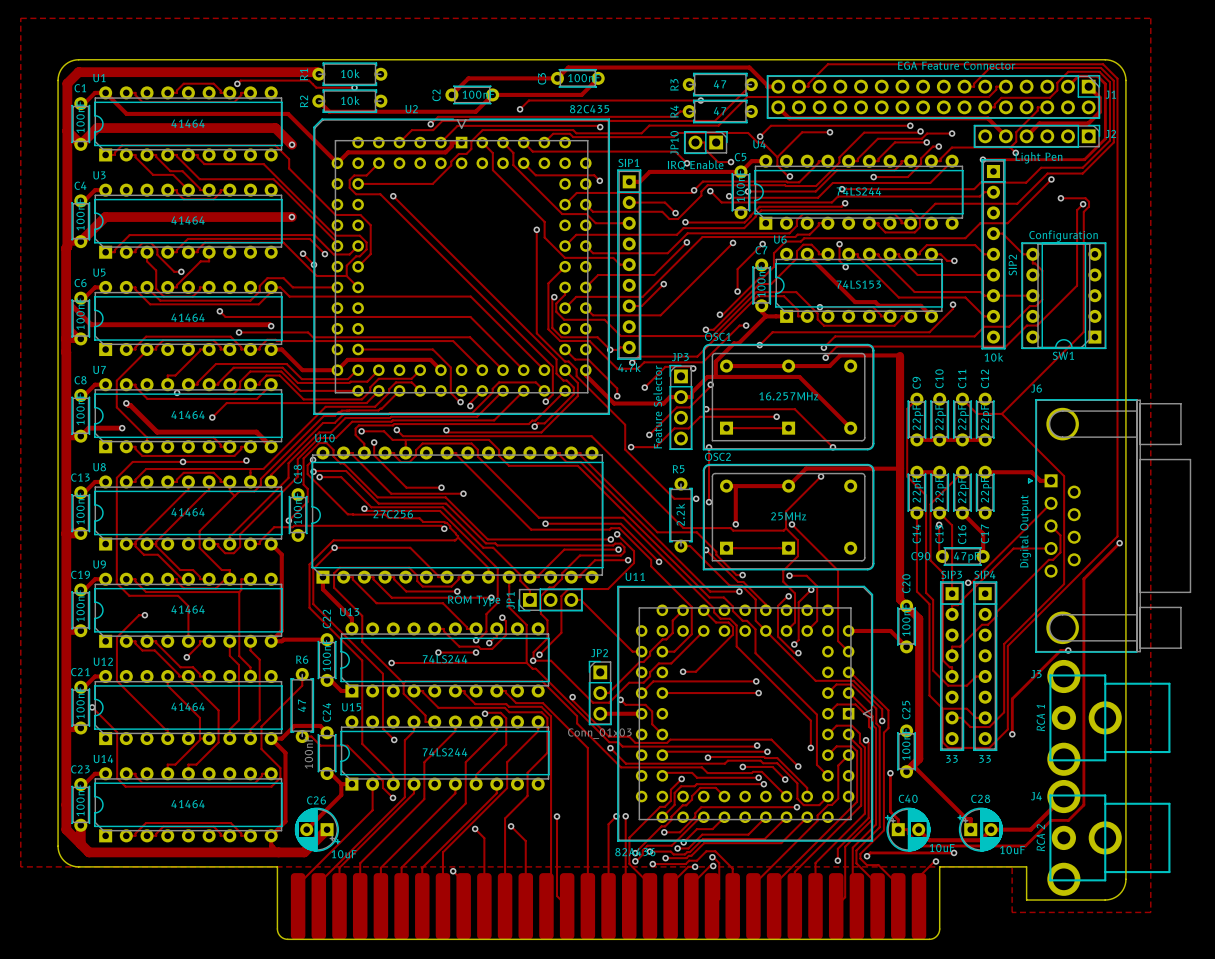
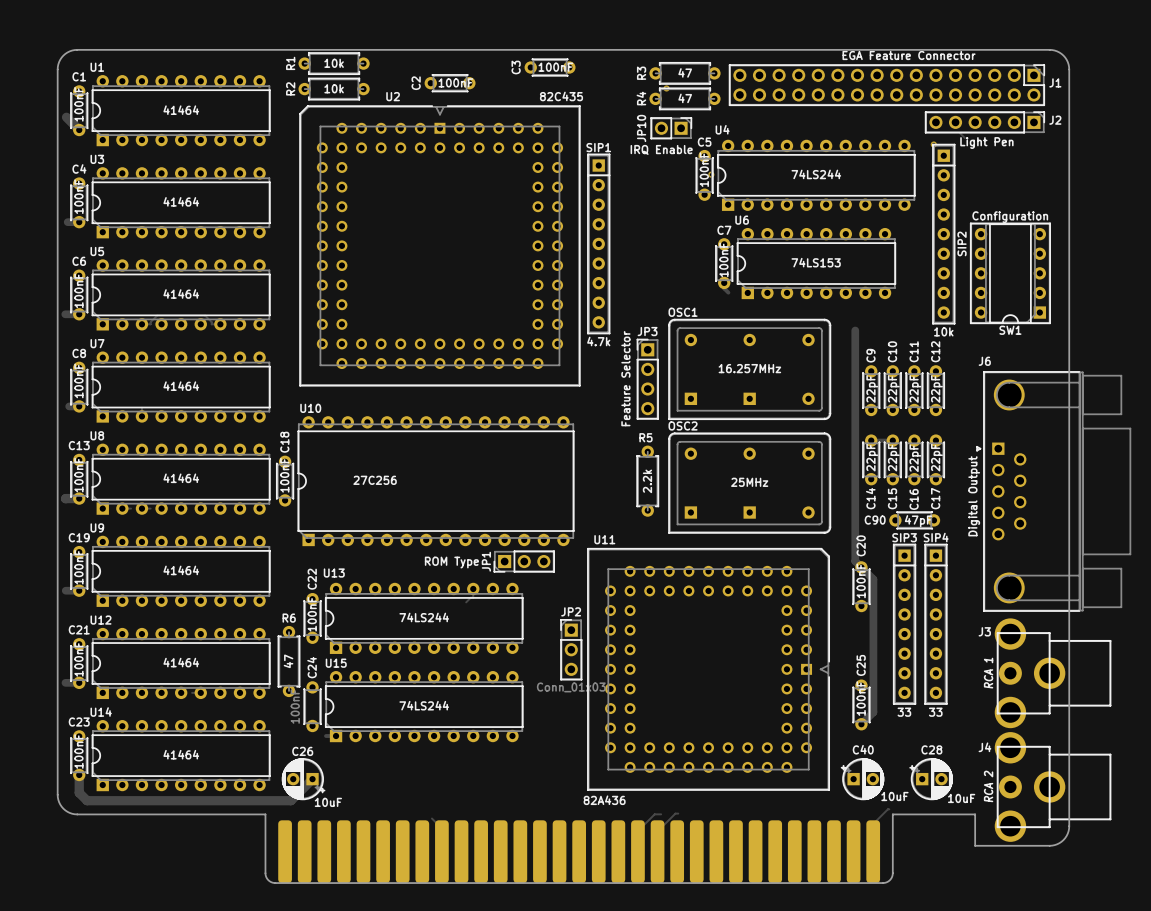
zone outline: (20, 18) (20, 866) (1012, 866) (1012, 912) (1150, 912) (1150, 18) (20, 18) -> none
track: (318, 74) (316, 72) (78, 72) (67, 83) (66, 829) (80, 844) -> none
track: (598, 78) (581, 94) (492, 94) (475, 111) (329, 111) (318, 101) -> none
track: (237, 83) (240, 80) (309, 80) (316, 87) (354, 87) -> none
via: (237, 83) -> none
track: (751, 84) (715, 120) (442, 120) (433, 130) (411, 130) (399, 142) -> none
track: (778, 86) (767, 86) (749, 67) (568, 67) (557, 78) (468, 78) (451, 94) -> none
track: (798, 86) (808, 86) (808, 83) (827, 64) (1103, 64) (1117, 78) (1117, 536) (1007, 646) (1007, 729) (989, 747) (948, 747) (942, 742) (942, 708) -> none
track: (964, 86) (974, 86) (974, 83) (989, 67) (1100, 67) (1113, 80) (1113, 142) (1082, 173) (1047, 173) (1017, 203) (935, 203) (919, 219) -> none
track: (1005, 86) (996, 86) (996, 89) (988, 97) (747, 97) (718, 125) (649, 125) (641, 133) (576, 133) (573, 130) (482, 130) (471, 141) (471, 149) (466, 153) (458, 153) (451, 161) (451, 165) (432, 183) (358, 183) -> none
track: (1068, 86) (1078, 76) (1097, 76) (1105, 84) (1105, 138) (1084, 159) (982, 159) -> none
track: (1088, 86) (1099, 97) (1099, 112) (1088, 123) (1039, 123) (1026, 136) -> none
via: (354, 87) -> none
track: (126, 92) (135, 92) (142, 102) (234, 102) (241, 92) (250, 92) -> none
track: (167, 92) (176, 92) (183, 83) (213, 83) (220, 92) (229, 92) -> none
track: (700, 100) (528, 100) (520, 109) -> none
track: (80, 103) (84, 103) (95, 92) (105, 92) (126, 113) (288, 113) (337, 163) (348, 152) (445, 152) (451, 146) (451, 142) (461, 142) -> none
track: (778, 107) (789, 118) (987, 118) (1005, 136) -> none
track: (985, 107) (994, 107) (994, 104) (1001, 97) (1049, 97) (1057, 90) (1057, 82) (1068, 71) (1099, 71) (1110, 82) (1110, 140) (1082, 167) (1041, 167) (1026, 182) (980, 182) (974, 189) (842, 189) -> none
track: (1047, 107) (1037, 107) (1037, 110) (1016, 132) (1016, 141) (1010, 147) (951, 147) (940, 161) (931, 161) -> none
via: (520, 109) -> none
track: (689, 111) (680, 111) (674, 116) (438, 116) (430, 124) -> none
via: (430, 124) -> none
track: (910, 125) (770, 125) (760, 136) -> none
via: (910, 125) -> none
track: (600, 127) (457, 125) (440, 142) -> none
via: (600, 127) -> none
track: (920, 131) (864, 132) (839, 157) (839, 162) (816, 186) (707, 185) (701, 191) (701, 195) (678, 219) (669, 219) (662, 211) (592, 211) (585, 204) -> none
via: (920, 131) -> none
track: (829, 132) (802, 132) (777, 157) -> none
via: (829, 132) -> none
track: (952, 133) (927, 133) (921, 138) (877, 138) (857, 158) (857, 161) (848, 161) -> none
via: (952, 133) -> none
via: (760, 136) -> none
track: (482, 142) (492, 153) (492, 170) (544, 221) (544, 237) (564, 257) (613, 257) (620, 264) (629, 264) -> none
track: (503, 142) (513, 152) (513, 165) (562, 214) (586, 214) (595, 223) (629, 223) -> none
track: (523, 142) (532, 151) (675, 151) (687, 163) -> none
track: (544, 142) (553, 133) (569, 133) (573, 137) (673, 137) (677, 132) (748, 132) (757, 142) (762, 142) (777, 157) -> none
track: (695, 142) (705, 142) (705, 149) (718, 162) (731, 162) -> none
track: (926, 142) (894, 142) (878, 158) (878, 161) (869, 161) -> none
via: (926, 142) -> none
track: (80, 144) (97, 128) (275, 128) (292, 144) -> none
via: (292, 144) -> none
track: (938, 146) (932, 146) (921, 158) (921, 163) (907, 177) (873, 177) -> none
via: (938, 146) -> none
via: (1015, 152) -> none
track: (105, 154) (114, 154) (122, 145) (275, 145) (289, 159) (289, 168) (335, 214) (360, 214) (370, 225) (370, 254) (358, 266) -> none
track: (126, 154) (135, 154) (135, 157) (153, 174) (173, 174) (188, 190) -> none
track: (147, 154) (156, 154) (170, 171) (182, 171) (199, 190) (209, 190) -> none
track: (167, 154) (176, 154) (199, 179) (273, 179) (337, 243) (337, 246) -> none
track: (188, 154) (197, 154) (204, 164) (263, 164) (335, 235) (359, 235) (366, 242) (366, 249) (346, 265) (346, 276) -> none
track: (777, 157) (777, 165) (789, 176) -> none
track: (765, 161) (751, 161) (741, 171) (649, 171) (639, 181) (629, 181) -> none
track: (827, 161) (818, 161) (799, 182) (702, 181) (691, 192) (576, 192) (565, 204) -> none
track: (910, 161) (901, 161) (894, 170) (836, 170) (815, 191) (748, 191) -> none
track: (952, 161) (930, 182) (832, 182) (818, 197) (730, 197) (729, 196) -> none
via: (731, 162) -> none
track: (378, 163) (366, 175) (354, 175) (349, 179) (349, 187) (356, 194) (380, 194) (552, 366) (552, 394) (545, 401) -> none
track: (523, 163) (535, 175) (594, 175) (599, 180) -> none
via: (687, 163) -> none
via: (789, 176) -> none
via: (873, 177) -> none
track: (1051, 179) (1007, 223) (980, 223) (965, 238) (804, 238) (800, 241) (785, 241) (773, 253) (773, 266) (762, 278) (759, 278) (722, 314) (719, 314) -> none
via: (1051, 179) -> none
via: (599, 180) -> none
via: (842, 189) -> none
track: (105, 190) (95, 190) (84, 200) (80, 200) -> none
track: (167, 190) (176, 190) (183, 199) (213, 199) (220, 190) (229, 190) -> none
via: (694, 190) -> none
track: (710, 191) (721, 202) (831, 202) (837, 196) (980, 196) (984, 192) (993, 192) -> none
via: (710, 191) -> none
track: (393, 196) (556, 359) (556, 373) (573, 387) (573, 394) (544, 423) (537, 423) (534, 426) -> none
via: (393, 196) -> none
via: (729, 196) -> none
track: (1060, 198) (1085, 198) (1089, 201) (1089, 206) (1083, 211) (1083, 332) (1001, 413) -> none
via: (1060, 198) -> none
track: (629, 202) (665, 202) (675, 213) -> none
track: (845, 203) (841, 206) (759, 206) (744, 222) (685, 222) -> none
via: (845, 203) -> none
track: (1083, 204) (1077, 210) (1077, 285) (1037, 325) (1026, 325) (1005, 346) (836, 346) (825, 357) -> none
via: (1083, 204) -> none
via: (675, 213) -> none
track: (291, 217) (105, 217) (80, 241) -> none
via: (291, 217) -> none
track: (919, 219) (911, 210) (761, 210) (744, 228) (683, 228) (676, 234) (576, 234) (565, 246) -> none
track: (919, 219) (919, 227) (914, 232) (885, 232) (878, 223) (869, 223) -> none
via: (685, 222) -> none
track: (827, 223) (818, 223) (809, 234) (797, 234) (795, 237) (702, 237) (642, 296) (576, 296) (565, 308) -> none
track: (910, 223) (901, 223) (894, 214) (802, 214) (796, 220) (796, 225) (789, 233) (687, 233) (667, 253) (593, 253) (585, 246) -> none
track: (536, 229) (536, 333) (564, 361) (568, 361) (576, 369) (576, 376) (625, 424) (625, 449) (674, 498) (696, 498) -> none
via: (536, 229) -> none
track: (993, 233) (1002, 233) (1023, 254) (1032, 254) (1032, 263) (1042, 270) (1042, 299) (1036, 306) (1029, 306) (1009, 326) (984, 326) (974, 336) (835, 336) (823, 347) -> none
track: (686, 242) (654, 274) (598, 274) (585, 287) -> none
via: (686, 242) -> none
track: (733, 242) (660, 315) (593, 315) (585, 308) -> none
via: (733, 242) -> none
track: (762, 244) (737, 269) (737, 291) -> none
via: (762, 244) -> none
track: (839, 244) (839, 260) (845, 267) -> none
via: (839, 244) -> none
track: (358, 246) (349, 254) (333, 254) (314, 235) (129, 235) (114, 249) (114, 252) (105, 252) -> none
track: (126, 252) (135, 252) (142, 243) (151, 243) (157, 249) (157, 254) (174, 271) (181, 271) -> none
track: (147, 252) (147, 261) (156, 270) (156, 288) (163, 296) (192, 296) (199, 287) (209, 287) -> none
track: (167, 252) (176, 252) (187, 238) (309, 238) (324, 254) -> none
track: (188, 252) (197, 252) (204, 242) (283, 242) (316, 276) (346, 276) -> none
track: (209, 252) (209, 261) (200, 261) (176, 287) (167, 287) -> none
track: (303, 253) (313, 264) -> none
via: (303, 253) -> none
via: (324, 254) -> none
track: (807, 254) (855, 302) (875, 302) (878, 305) (920, 305) (931, 316) -> none
track: (828, 254) (818, 254) (811, 244) (803, 244) (796, 251) (796, 258) (771, 284) (759, 284) (713, 329) (705, 329) -> none
track: (848, 254) (857, 254) (857, 256) (898, 297) (965, 297) (984, 316) (993, 316) -> none
track: (869, 254) (878, 254) (914, 292) (980, 292) (984, 295) (1032, 295) -> none
track: (890, 254) (899, 254) (899, 256) (917, 274) (993, 274) -> none
track: (910, 254) (919, 254) (926, 245) (975, 245) (984, 254) (993, 254) -> none
track: (931, 254) (940, 254) (947, 260) (954, 260) -> none
via: (954, 260) -> none
via: (313, 264) -> none
track: (565, 266) (548, 283) (548, 329) (560, 340) (589, 340) (617, 368) (637, 368) (644, 362) (702, 362) (739, 325) (746, 325) -> none
via: (845, 267) -> none
via: (181, 271) -> none
track: (346, 276) (358, 287) -> none
track: (663, 284) (641, 306) (629, 306) -> none
via: (663, 284) -> none
track: (105, 287) (95, 287) (84, 298) (80, 298) -> none
track: (126, 287) (135, 287) (150, 304) (258, 304) (275, 287) -> none
track: (147, 287) (160, 300) (250, 300) (259, 291) (259, 285) (267, 278) (283, 278) (292, 287) (337, 287) -> none
track: (271, 287) (280, 287) (289, 296) (470, 296) (544, 370) -> none
track: (565, 287) (565, 294) (556, 303) (556, 311) (564, 319) (604, 319) (620, 336) (712, 336) (756, 292) (796, 292) (817, 313) (817, 319) (823, 325) (894, 325) (901, 316) (910, 316) -> none
via: (737, 291) -> none
track: (554, 297) (552, 299) (552, 328) (561, 337) (597, 337) (610, 349) (629, 347) -> none
via: (554, 297) -> none
track: (953, 304) (953, 308) (929, 332) (772, 332) (759, 345) -> none
via: (953, 304) -> none
track: (819, 307) (873, 307) (880, 316) (890, 316) -> none
via: (819, 307) -> none
track: (219, 311) (225, 316) (470, 316) (523, 370) -> none
via: (219, 311) -> none
via: (719, 314) -> none
track: (786, 316) (766, 316) (738, 343) (733, 343) (715, 361) (715, 376) -> none
track: (807, 316) (798, 316) (798, 310) (783, 296) (757, 296) (697, 356) (638, 356) (632, 362) -> none
via: (746, 325) -> none
track: (271, 326) (91, 324) (69, 303) (69, 327) (80, 338) -> none
via: (271, 326) -> none
via: (705, 329) -> none
track: (239, 332) (308, 332) (312, 337) (470, 337) (503, 370) -> none
via: (239, 332) -> none
via: (759, 345) -> none
via: (823, 347) -> none
track: (126, 349) (135, 349) (146, 336) (230, 336) (241, 349) (259, 349) (267, 339) (453, 341) (482, 370) -> none
track: (148, 349) (116, 380) (116, 407) (147, 437) (213, 437) (220, 446) (229, 446) -> none
track: (209, 349) (199, 349) (175, 375) (167, 375) (167, 384) -> none
track: (271, 349) (281, 349) (302, 370) (337, 370) (347, 359) (430, 359) (440, 370) -> none
track: (358, 349) (432, 349) (450, 367) (450, 393) (460, 402) -> none
track: (565, 349) (575, 359) (588, 359) (617, 388) (617, 396) -> none
via: (610, 349) -> none
track: (900, 356) (840, 355) (829, 366) (726, 366) -> none
via: (825, 357) -> none
via: (632, 362) -> none
track: (693, 368) (691, 366) (665, 366) (644, 387) -> none
via: (693, 368) -> none
track: (358, 370) (348, 379) (301, 379) (286, 364) (215, 364) (197, 382) (197, 384) (188, 384) -> none
track: (378, 370) (367, 381) (297, 382) (282, 367) (233, 367) (218, 384) (209, 384) -> none
track: (420, 370) (411, 378) (378, 378) (361, 399) (303, 399) (279, 375) (266, 375) (259, 384) (250, 384) -> none
track: (565, 370) (577, 383) (577, 396) (541, 432) (448, 432) (446, 430) -> none
track: (585, 370) (585, 375) (614, 403) (663, 403) (669, 397) (691, 397) (691, 392) (707, 376) (799, 376) (850, 428) -> none
track: (105, 384) (95, 384) (84, 395) (80, 395) -> none
track: (126, 384) (135, 384) (147, 398) (256, 398) (271, 384) -> none
track: (710, 384) (689, 407) (676, 407) (649, 434) -> none
via: (710, 384) -> none
via: (644, 387) -> none
track: (358, 390) (300, 390) (281, 371) (250, 371) (240, 381) (240, 387) (233, 393) (177, 392) -> none
track: (378, 390) (366, 403) (226, 403) (212, 417) -> none
track: (399, 390) (378, 410) (347, 410) -> none
track: (420, 390) (411, 382) (395, 382) (389, 389) (389, 392) (375, 406) (325, 406) (263, 469) (146, 469) (135, 481) (126, 481) -> none
track: (482, 390) (470, 402) (470, 406) -> none
track: (503, 390) (477, 416) (345, 418) (331, 432) (319, 432) (288, 463) (288, 478) (229, 534) (229, 544) -> none
track: (523, 390) (494, 420) (352, 421) (335, 437) (318, 437) (297, 459) (297, 476) (240, 534) (240, 546) (233, 553) (225, 553) (218, 544) (209, 544) -> none
track: (544, 390) (535, 382) (499, 382) (492, 388) (492, 392) (472, 413) (343, 414) (334, 422) (323, 422) (271, 474) (271, 481) -> none
track: (565, 390) (535, 420) (528, 424) (358, 425) (355, 428) (355, 435) (364, 443) (364, 452) -> none
via: (177, 392) -> none
via: (617, 396) -> none
track: (916, 399) (907, 408) (907, 476) (926, 495) (926, 592) (933, 599) (933, 670) (948, 685) (966, 685) (976, 676) (985, 676) -> none
track: (962, 399) (977, 413) (1001, 413) -> none
via: (545, 401) -> none
via: (460, 402) -> none
track: (126, 403) (157, 432) (256, 432) (271, 446) -> none
via: (126, 403) -> none
via: (470, 406) -> none
track: (706, 409) (794, 409) (832, 447) -> none
via: (706, 409) -> none
track: (347, 410) (341, 410) (334, 416) (323, 416) (260, 478) (260, 484) (254, 491) (239, 491) (199, 531) (199, 547) (221, 570) (229, 570) (229, 579) -> none
track: (1001, 413) (1064, 476) (1064, 584) (1004, 644) (1004, 712) (989, 727) (970, 727) (961, 717) (952, 717) -> none
track: (776, 416) (700, 416) (688, 428) (674, 428) (655, 447) (631, 447) -> none
via: (776, 416) -> none
via: (212, 417) -> none
via: (534, 426) -> none
track: (122, 428) (88, 428) (80, 436) -> none
via: (122, 428) -> none
track: (726, 428) (788, 428) -> none
track: (396, 429) (403, 436) (591, 436) (683, 528) (730, 528) (733, 530) (783, 530) (786, 528) -> none
via: (396, 429) -> none
via: (446, 430) -> none
track: (361, 431) (384, 431) (392, 439) (488, 439) (499, 450) (499, 455) (509, 465) (577, 465) (709, 597) (723, 597) (732, 606) (732, 611) (755, 629) (755, 653) (816, 714) (816, 764) (827, 775) -> none
via: (361, 431) -> none
via: (649, 434) -> none
track: (405, 439) (405, 452) -> none
track: (916, 439) (985, 439) -> none
track: (374, 442) (374, 455) (406, 487) (441, 487) -> none
via: (374, 442) -> none
track: (126, 446) (135, 446) (142, 455) (234, 455) (241, 446) (250, 446) -> none
via: (631, 447) -> none
track: (709, 447) (709, 502) -> none
via: (709, 447) -> none
via: (832, 447) -> none
track: (343, 452) (352, 452) (352, 455) (391, 493) (463, 493) -> none
track: (385, 452) (394, 452) (401, 462) (409, 462) (416, 455) (416, 450) (422, 443) (471, 443) (477, 449) (477, 456) (538, 517) (623, 517) (714, 608) (714, 612) (720, 618) (729, 618) (736, 625) (736, 646) (810, 720) (810, 747) -> none
track: (447, 452) (456, 452) (531, 529) (619, 528) (651, 559) (651, 566) (691, 606) (691, 634) (674, 651) (662, 651) -> none
track: (550, 452) (559, 452) (566, 462) (580, 462) (710, 591) (739, 591) -> none
track: (571, 452) (580, 452) (580, 455) (657, 532) (696, 532) (736, 575) (742, 575) -> none
track: (313, 459) (307, 465) (307, 474) (347, 514) (385, 514) (388, 518) (419, 518) (423, 521) (444, 521) (450, 526) (458, 537) -> none
via: (313, 459) -> none
track: (246, 460) (132, 461) (116, 477) (116, 583) (129, 595) (178, 595) (188, 606) (188, 641) -> none
via: (246, 460) -> none
via: (183, 461) -> none
track: (900, 468) (806, 468) (788, 486) (726, 486) -> none
track: (250, 469) (250, 481) -> none
track: (313, 471) (346, 470) (378, 503) (446, 503) (485, 543) (495, 543) (497, 545) (613, 545) (620, 543) (624, 547) (624, 552) (620, 555) (579, 555) (562, 573) (562, 578) (540, 596) (540, 613) (547, 620) (547, 638) (533, 652) (533, 660) -> none
via: (313, 471) -> none
track: (962, 472) (930, 504) (930, 560) (942, 572) (942, 660) (952, 667) (952, 676) -> none
track: (985, 472) (1031, 472) (1040, 480) (1051, 480) -> none
track: (821, 476) (786, 511) (786, 528) -> none
via: (821, 476) -> none
track: (319, 477) (341, 477) (371, 507) (442, 507) (483, 547) (493, 547) (520, 574) (520, 580) (529, 590) (529, 599) -> none
via: (319, 477) -> none
track: (105, 481) (95, 481) (84, 492) (80, 492) -> none
track: (167, 481) (176, 481) (183, 472) (213, 472) (220, 481) (229, 481) (229, 491) (234, 496) -> none
track: (188, 481) (188, 491) (135, 541) (135, 546) (143, 554) (157, 554) (182, 579) (188, 579) -> none
track: (209, 481) (209, 491) (206, 491) (156, 541) (156, 545) (180, 570) (193, 570) (199, 579) (209, 579) -> none
track: (735, 486) (735, 524) -> none
via: (441, 487) -> none
via: (463, 493) -> none
via: (696, 498) -> none
via: (709, 502) -> none
track: (1051, 503) (971, 582) (968, 582) -> none
track: (364, 508) (366, 510) (440, 510) (497, 568) (497, 602) (486, 614) (486, 631) (476, 640) -> none
via: (364, 508) -> none
track: (916, 513) (916, 591) (929, 604) (929, 695) (942, 708) -> none
track: (939, 513) (952, 525) (952, 593) -> none
track: (962, 513) (983, 533) (983, 556) -> none
track: (288, 520) (307, 501) (307, 488) (303, 484) (303, 458) (319, 443) (326, 443) (333, 449) (333, 456) (340, 463) (343, 463) (377, 497) (445, 497) (487, 539) (610, 539) -> none
via: (288, 520) -> none
track: (545, 523) (620, 523) (659, 561) -> none
via: (545, 523) -> none
via: (735, 524) -> none
track: (791, 524) (838, 570) (838, 641) (848, 651) -> none
via: (791, 524) -> none
track: (939, 524) (939, 553) (942, 556) -> none
via: (939, 524) -> none
track: (1051, 525) (1060, 535) (1060, 552) (1053, 559) (1048, 559) (996, 611) (996, 615) (987, 624) (982, 624) (960, 646) (952, 646) (952, 655) -> none
track: (444, 528) (441, 525) (274, 527) (259, 544) (250, 544) -> none
via: (444, 528) -> none
track: (786, 528) (797, 540) (797, 556) (783, 570) (783, 581) (795, 593) (795, 622) (786, 630) -> none
track: (617, 534) (634, 551) (634, 563) (608, 589) (568, 589) (561, 596) (561, 632) (539, 654) -> none
via: (617, 534) -> none
track: (458, 537) (454, 540) -> none
track: (458, 537) (488, 567) (488, 577) -> none
via: (610, 539) -> none
track: (454, 540) (333, 540) (309, 564) (309, 607) (362, 660) (362, 743) (393, 774) (393, 784) -> none
track: (1119, 543) (1083, 578) (1083, 805) (1068, 820) (1051, 820) (1025, 845) (920, 845) (908, 833) (908, 829) (898, 829) (898, 819) (890, 811) (890, 773) -> none
via: (1119, 543) -> none
track: (271, 544) (281, 554) (281, 630) (271, 641) (327, 639) -> none
track: (680, 546) (690, 546) (729, 585) (741, 585) (755, 599) (755, 620) (815, 680) (853, 680) (882, 709) (882, 721) -> none
via: (334, 547) -> none
track: (726, 548) (788, 548) -> none
track: (1051, 548) (1013, 548) (957, 605) (952, 605) (952, 614) -> none
track: (618, 549) (564, 549) (539, 574) (539, 577) (529, 577) -> none
via: (618, 549) -> none
track: (706, 550) (738, 582) (743, 582) (765, 604) (765, 610) -> none
via: (706, 550) -> none
track: (628, 560) (595, 560) (580, 577) (571, 577) -> none
via: (628, 560) -> none
via: (659, 561) -> none
track: (229, 574) (216, 588) (183, 588) (176, 579) (167, 579) -> none
via: (742, 575) -> none
track: (789, 575) (806, 575) (817, 586) (817, 621) (807, 630) -> none
via: (789, 575) -> none
track: (322, 577) (322, 589) (351, 618) (351, 628) -> none
track: (343, 577) (352, 577) (352, 579) (376, 603) (442, 603) (466, 628) (476, 628) -> none
track: (364, 577) (373, 577) (373, 579) (391, 597) (491, 597) -> none
track: (385, 577) (394, 577) (406, 591) (457, 591) -> none
track: (447, 577) (437, 577) (410, 547) (334, 547) (313, 569) (313, 604) (382, 673) (382, 728) (394, 739) -> none
track: (467, 577) (458, 577) (451, 586) (422, 586) (417, 581) (417, 575) (409, 567) (339, 567) (334, 573) (334, 587) (362, 615) (362, 642) (403, 683) -> none
track: (509, 577) (509, 607) (526, 624) (526, 662) -> none
track: (105, 579) (95, 579) (84, 589) (80, 589) -> none
track: (126, 579) (135, 579) (146, 592) (239, 592) -> none
track: (250, 579) (241, 579) (241, 589) (239, 592) -> none
via: (968, 582) -> none
track: (811, 589) (798, 602) (798, 640) (794, 644) -> none
via: (811, 589) -> none
via: (457, 591) -> none
via: (739, 591) -> none
track: (239, 592) (239, 656) (250, 667) (250, 676) -> none
track: (788, 596) (777, 605) (777, 636) (794, 653) (798, 653) -> none
via: (788, 596) -> none
via: (491, 597) -> none
track: (571, 599) (580, 599) (632, 651) (641, 651) -> none
track: (683, 610) (672, 620) (672, 633) (666, 639) (662, 639) (650, 651) (650, 655) (643, 662) (639, 662) (609, 693) (600, 693) -> none
track: (703, 610) (716, 622) (728, 622) (732, 626) (732, 634) (695, 671) (683, 671) -> none
track: (144, 615) (139, 615) (116, 637) (116, 680) (165, 729) (167, 729) (167, 738) -> none
via: (144, 615) -> none
track: (502, 617) (506, 621) (506, 635) (492, 648) (459, 646) (443, 631) (443, 628) (434, 628) -> none
via: (502, 617) -> none
track: (703, 630) (671, 663) (658, 663) (643, 682) (629, 682) (609, 702) (593, 702) (551, 660) (533, 660) -> none
track: (848, 630) (890, 630) (906, 646) -> none
via: (476, 640) -> none
track: (126, 641) (135, 641) (142, 650) (154, 650) (179, 676) (188, 676) -> none
track: (147, 641) (156, 641) (180, 667) (193, 667) (199, 676) (209, 676) -> none
track: (209, 641) (199, 641) (199, 644) (186, 657) -> none
track: (229, 641) (229, 655) (238, 665) (238, 720) (229, 729) (229, 738) -> none
track: (250, 641) (250, 650) (259, 659) (259, 720) (250, 729) (250, 738) -> none
via: (489, 643) -> none
via: (794, 644) -> none
track: (1068, 650) (1060, 650) (1012, 698) (1012, 734) -> none
via: (1068, 650) -> none
track: (438, 652) (476, 652) -> none
via: (438, 652) -> none
via: (476, 652) -> none
via: (798, 653) -> none
via: (539, 654) -> none
via: (186, 657) -> none
via: (533, 660) -> none
via: (391, 662) -> none
track: (526, 662) (391, 662) -> none
track: (526, 662) (532, 668) (535, 668) (609, 742) (618, 742) (622, 746) (757, 745) -> none
via: (683, 671) -> none
track: (848, 672) (888, 710) (888, 728) (883, 732) (883, 830) (860, 853) (860, 858) (866, 865) (878, 865) (898, 884) (898, 906) -> none
track: (302, 674) (302, 685) (261, 726) (261, 749) (280, 767) (280, 777) (271, 786) (125, 786) (117, 778) (117, 732) (92, 707) -> none
track: (105, 676) (95, 676) (84, 687) (80, 687) -> none
track: (167, 676) (167, 685) (199, 717) (199, 740) (175, 764) (167, 764) (167, 773) -> none
track: (184, 676) (218, 710) (218, 742) (196, 764) (188, 764) (188, 773) -> none
track: (327, 680) (330, 680) (341, 690) (351, 690) -> none
track: (756, 681) (653, 681) (641, 693) -> none
via: (756, 681) -> none
track: (403, 683) (405, 681) (542, 681) (577, 716) (577, 723) (621, 767) (701, 767) (707, 773) (761, 771) (786, 796) -> none
track: (403, 683) (403, 693) (425, 715) (425, 722) (434, 722) -> none
track: (414, 690) (423, 690) (438, 707) (504, 707) (509, 712) (541, 712) (547, 717) (547, 752) (527, 772) (527, 795) (505, 818) (505, 906) -> none
track: (455, 690) (464, 690) (475, 704) (541, 706) (551, 716) (551, 901) (546, 906) -> none
track: (496, 690) (505, 690) (516, 703) (542, 703) (587, 748) (587, 906) -> none
track: (662, 693) (758, 693) -> none
via: (758, 693) -> none
track: (827, 693) (836, 684) (852, 684) (876, 708) (876, 723) (879, 727) (879, 827) (856, 850) (856, 863) (877, 884) (877, 906) -> none
track: (848, 693) (872, 716) (872, 725) (876, 728) (876, 824) (852, 847) (852, 902) (856, 906) -> none
track: (572, 697) (572, 700) (609, 736) (629, 736) (635, 742) (667, 742) (670, 739) (771, 739) (798, 766) -> none
via: (572, 697) -> none
track: (620, 699) (625, 704) (645, 704) (652, 711) (652, 724) (662, 734) -> none
via: (620, 699) -> none
via: (92, 707) -> none
track: (942, 708) (966, 708) (976, 717) (985, 717) -> none
track: (485, 713) (500, 712) (506, 718) (506, 744) (476, 774) (476, 784) -> none
via: (485, 713) -> none
track: (600, 713) (641, 713) -> none
track: (827, 713) (837, 704) (855, 704) (868, 717) (868, 726) (872, 729) (872, 819) (845, 846) (845, 897) (836, 906) -> none
via: (882, 721) -> none
track: (414, 722) (414, 731) (404, 740) (404, 797) (318, 883) (318, 906) -> none
track: (455, 722) (455, 731) (424, 762) (424, 799) (360, 863) (360, 906) -> none
track: (496, 722) (496, 731) (465, 762) (465, 803) (401, 867) (401, 906) -> none
track: (538, 722) (538, 731) (507, 762) (507, 788) (442, 852) (442, 906) -> none
track: (327, 732) (320, 725) (294, 725) (281, 738) (271, 738) (285, 752) (285, 821) (271, 835) (271, 846) (278, 852) -> none
track: (827, 734) (836, 725) (851, 725) (859, 733) (859, 742) (864, 747) (864, 813) (815, 863) (815, 906) -> none
track: (848, 734) (861, 748) (861, 805) (794, 871) (794, 906) -> none
via: (1012, 734) -> none
track: (302, 736) (311, 736) (320, 745) (347, 745) (382, 781) (382, 787) (393, 797) -> none
via: (394, 739) -> none
track: (866, 740) (868, 742) (868, 818) (837, 848) (837, 860) -> none
via: (866, 740) -> none
via: (757, 745) -> none
via: (810, 747) -> none
track: (610, 748) (625, 763) (724, 763) (727, 760) (760, 760) (763, 763) (777, 763) (797, 783) (797, 798) (803, 805) (819, 805) (827, 796) -> none
via: (610, 748) -> none
track: (767, 751) (665, 751) (662, 755) -> none
via: (767, 751) -> none
track: (827, 755) (836, 746) (852, 746) (857, 751) (857, 801) (774, 884) (774, 906) -> none
track: (848, 755) (838, 765) (838, 798) (831, 804) (828, 804) (817, 815) (817, 820) (753, 884) (753, 906) -> none
track: (707, 757) (777, 758) (807, 787) (807, 796) -> none
via: (707, 757) -> none
track: (912, 765) (966, 819) (970, 819) (970, 829) -> none
track: (742, 766) (772, 766) (785, 779) -> none
via: (742, 766) -> none
via: (798, 766) -> none
track: (105, 773) (95, 773) (84, 784) (80, 784) -> none
track: (126, 773) (135, 773) (142, 782) (255, 782) (262, 773) (271, 773) -> none
track: (327, 773) (330, 773) (341, 784) (341, 795) (306, 829) -> none
via: (890, 773) -> none
track: (662, 775) (665, 772) (692, 772) (697, 777) (758, 777) -> none
via: (758, 777) -> none
track: (681, 778) (670, 789) (670, 800) (664, 806) (660, 806) (629, 837) (629, 863) (649, 884) (649, 906) -> none
via: (681, 778) -> none
via: (785, 779) -> none
track: (372, 784) (372, 810) (298, 884) (298, 906) -> none
track: (414, 784) (414, 793) (339, 867) (339, 906) -> none
track: (455, 784) (455, 793) (380, 867) (380, 906) -> none
track: (496, 784) (496, 793) (422, 867) (422, 906) -> none
track: (763, 784) (696, 784) (694, 786) (681, 786) (674, 792) (674, 804) (662, 817) -> none
via: (763, 784) -> none
track: (724, 796) (715, 787) (700, 787) (692, 796) (692, 799) (686, 805) (682, 805) (671, 816) (671, 820) (665, 826) (661, 826) (635, 853) -> none
track: (1063, 796) (1030, 829) (991, 829) (980, 840) (929, 840) (918, 829) -> none
via: (393, 797) -> none
track: (796, 807) (701, 807) (695, 813) (695, 817) (679, 832) (664, 832) -> none
via: (796, 807) -> none
track: (557, 816) (557, 896) (567, 906) -> none
via: (557, 816) -> none
track: (616, 816) (608, 824) (608, 906) -> none
via: (616, 816) -> none
track: (625, 816) (625, 902) (629, 906) -> none
via: (625, 816) -> none
track: (703, 817) (700, 817) (671, 845) (647, 845) (642, 850) (642, 854) (635, 861) -> none
track: (724, 817) (712, 829) (696, 829) (683, 842) -> none
track: (765, 817) (748, 834) (702, 834) (688, 848) (677, 848) -> none
track: (786, 817) (764, 839) (703, 839) (684, 854) (673, 854) (670, 851) (649, 851) -> none
track: (807, 817) (781, 843) (704, 843) (686, 858) (665, 858) -> none
track: (511, 826) (525, 841) (525, 906) -> none
via: (511, 826) -> none
track: (475, 828) (484, 838) (484, 906) -> none
via: (475, 828) -> none
via: (664, 832) -> none
track: (126, 835) (135, 835) (146, 823) (230, 823) (241, 835) (250, 835) -> none
track: (147, 835) (156, 835) (163, 826) (213, 826) (220, 835) (229, 835) -> none
via: (683, 842) -> none
via: (677, 848) -> none
via: (649, 851) -> none
track: (954, 852) (870, 852) (867, 856) -> none
via: (954, 852) -> none
via: (635, 853) -> none
via: (867, 856) -> none
track: (712, 857) (719, 863) (719, 899) (712, 906) -> none
via: (712, 857) -> none
via: (665, 858) -> none
via: (837, 860) -> none
via: (635, 861) -> none
via: (935, 861) -> none
track: (652, 864) (685, 864) (689, 860) (696, 860) (706, 851) (715, 851) (732, 868) (732, 906) -> none
via: (652, 864) -> none
via: (695, 866) -> none
via: (713, 866) -> none
via: (453, 871) -> none

